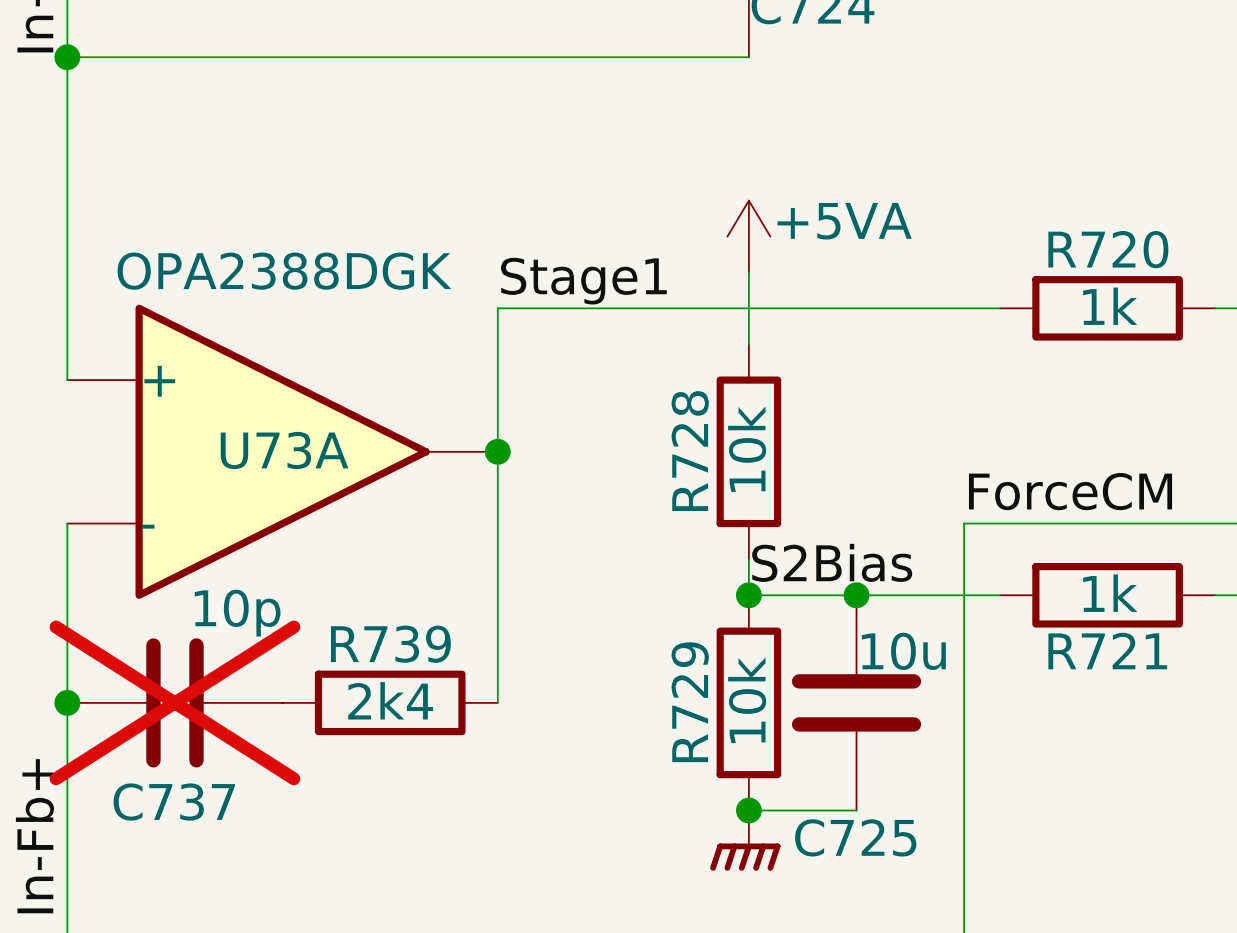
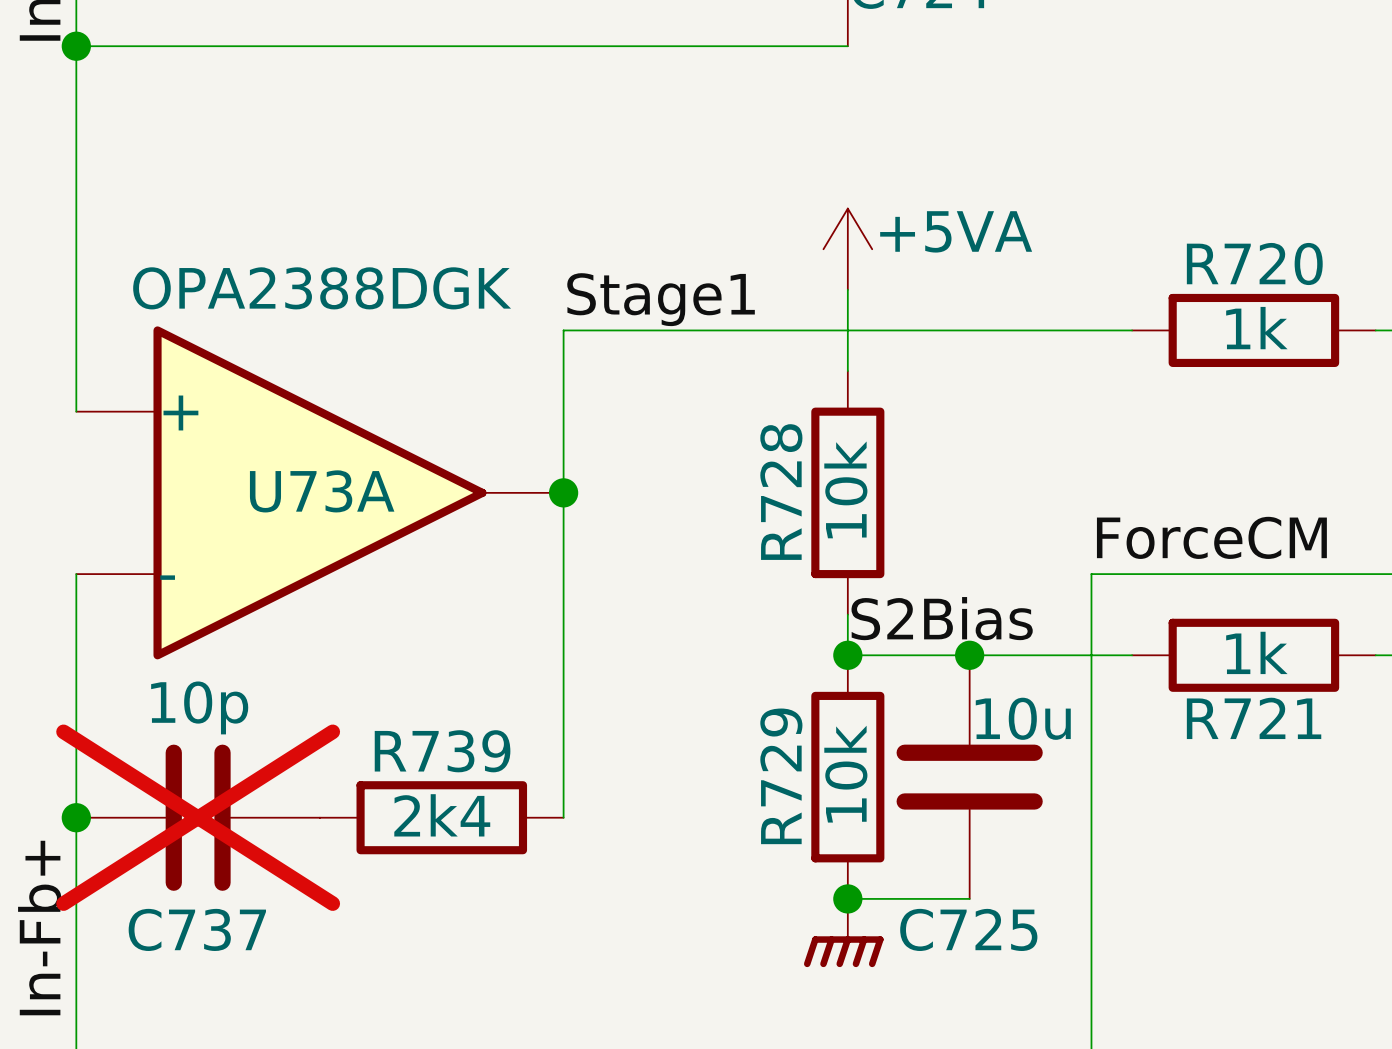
C737 value position: 10p (237, 613) -> 10p (199, 707)
junction position: (67, 702) -> (76, 817)
C737 position: (174, 702) -> (198, 817)
R739 position: (390, 702) -> (441, 817)
wire: none -> (563, 777) (563, 817)

